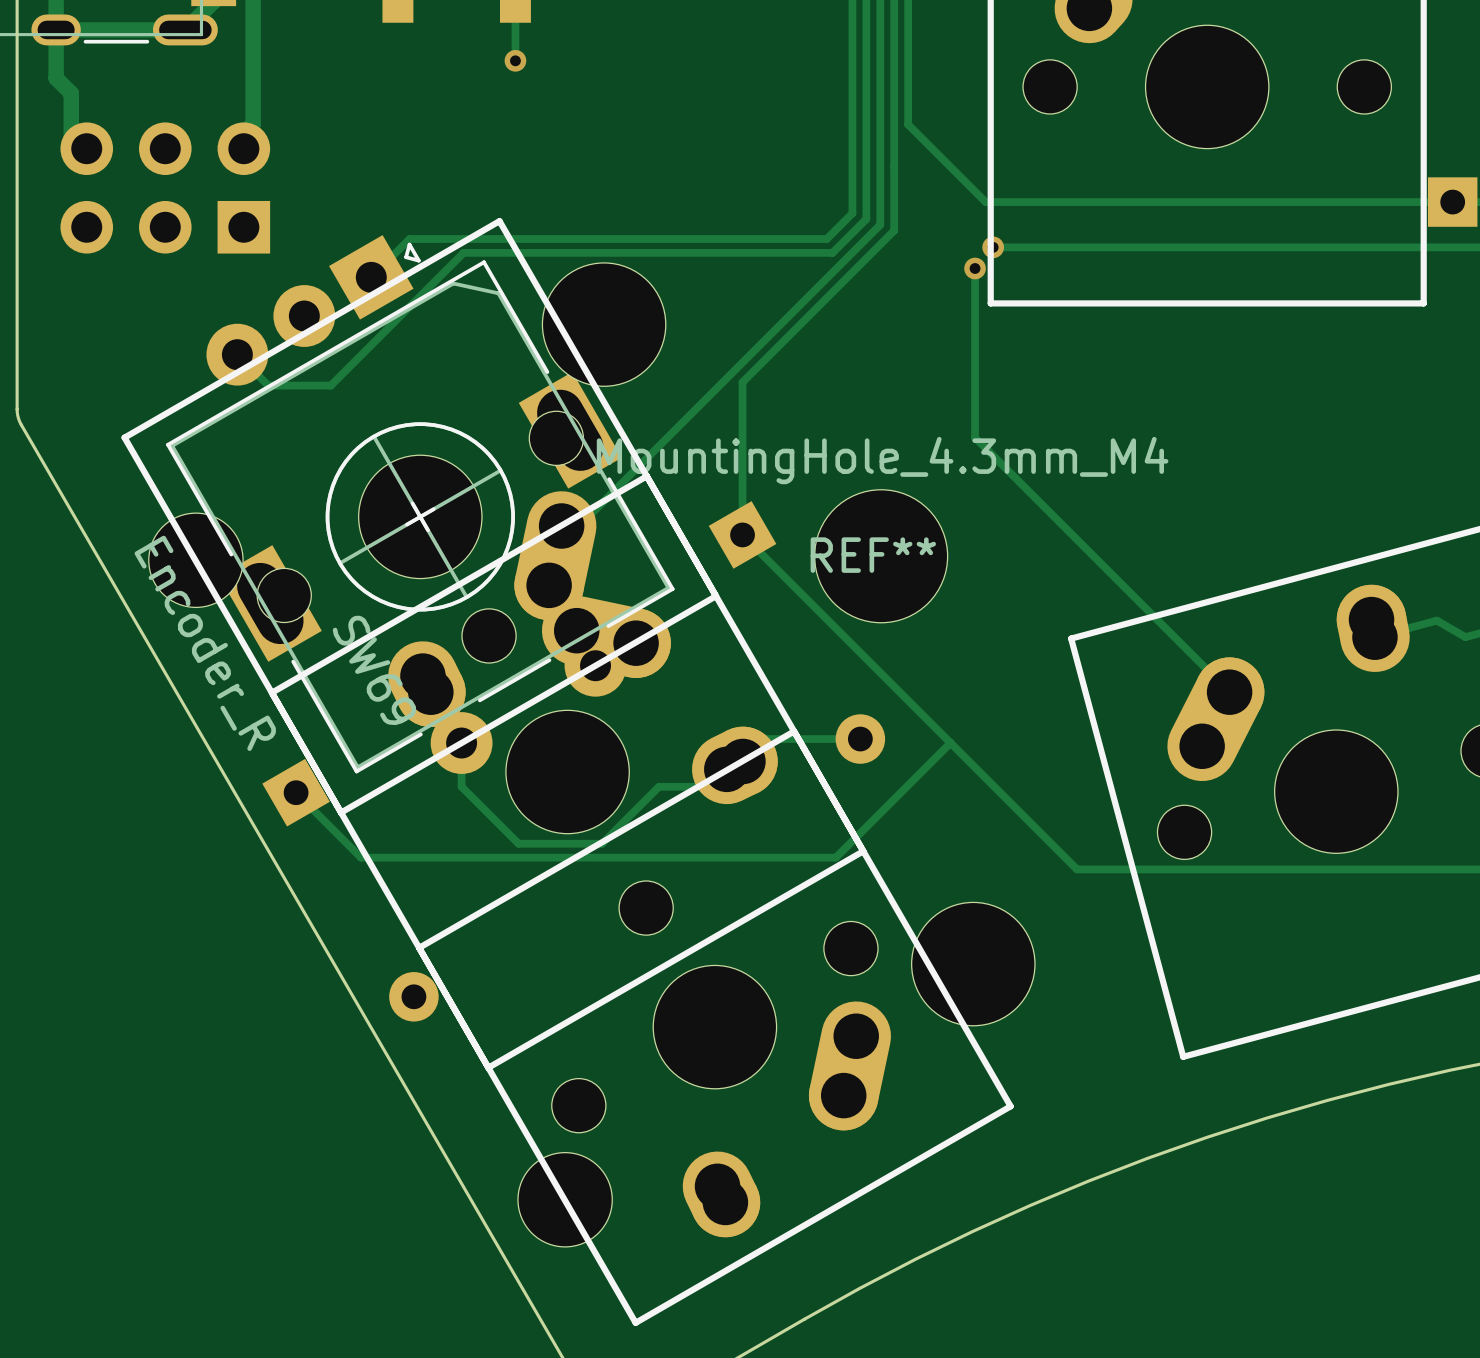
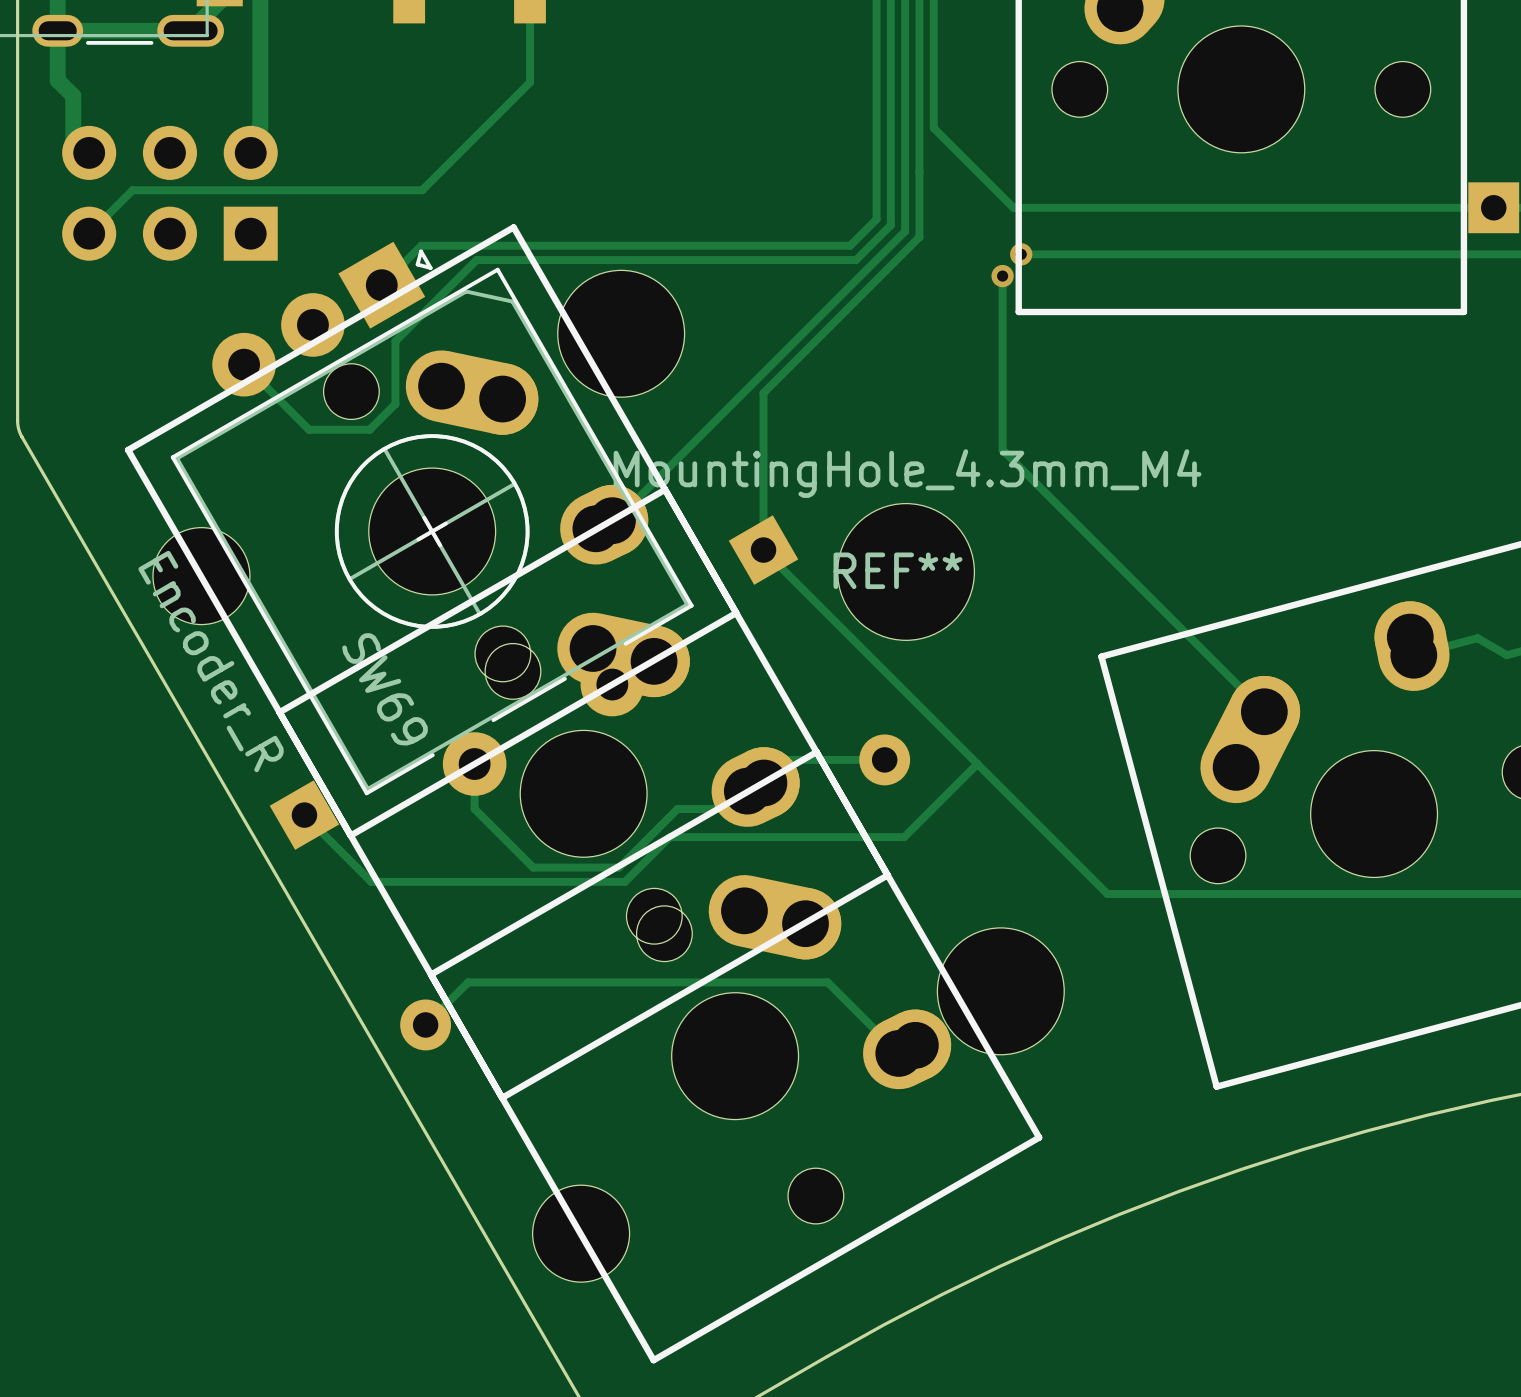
track: none -> (530, 62) (530, 82) (422, 190) (132, 190) (89, 233)
via: (515, 60) -> none
SW69 footprint: [166, 235, 675, 774] -> [170, 241, 694, 796]
track: (384, 331) (330, 385) (268, 385) -> (395, 341) (395, 404) (369, 429) (309, 429) (275, 396)
part rotation: 0° (420, 516) -> 90° counterclockwise (432, 531)
track: (879, 814) (835, 857) (607, 857) -> (904, 837) (669, 837) (624, 881)
track: none -> (425, 1024) (468, 982) (827, 982) (898, 1053)
part rotation: 0° (714, 1027) -> 90° counterclockwise (735, 1056)

